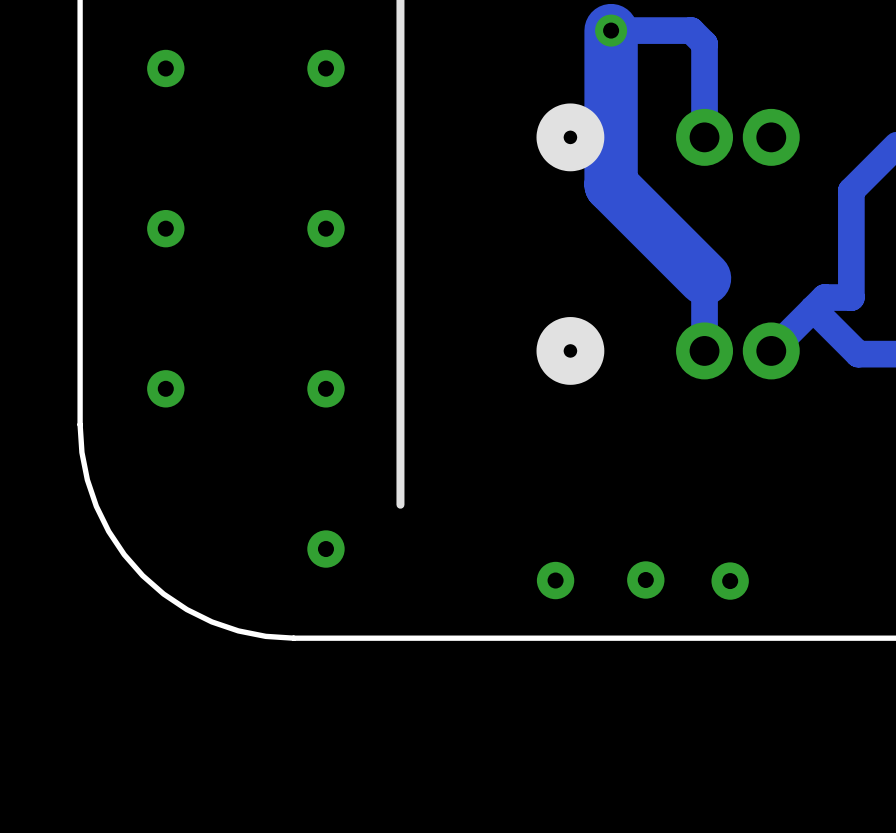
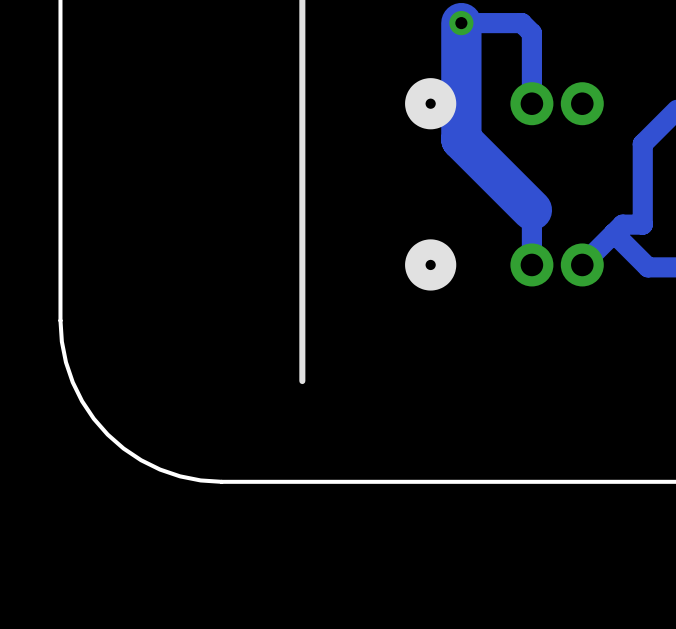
via: (165, 68) -> none
via: (325, 68) -> none
via: (165, 228) -> none
via: (325, 228) -> none
via: (165, 388) -> none
via: (325, 388) -> none
via: (325, 549) -> none
via: (645, 579) -> none
via: (555, 580) -> none
via: (730, 581) -> none

